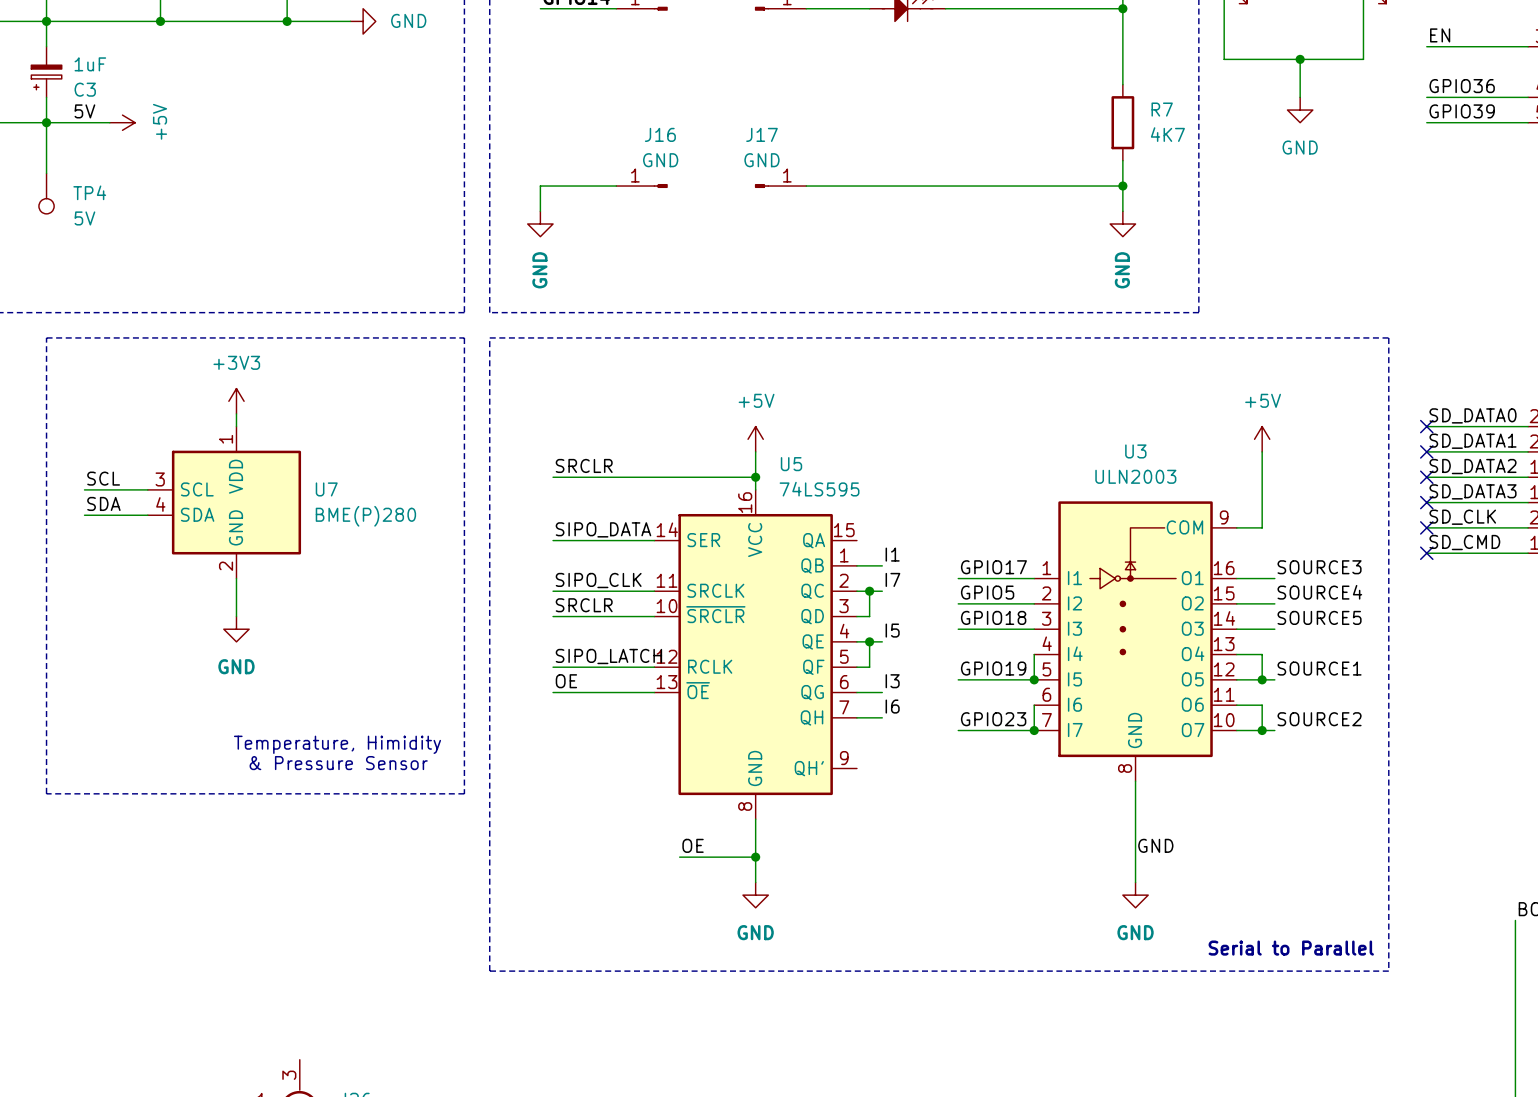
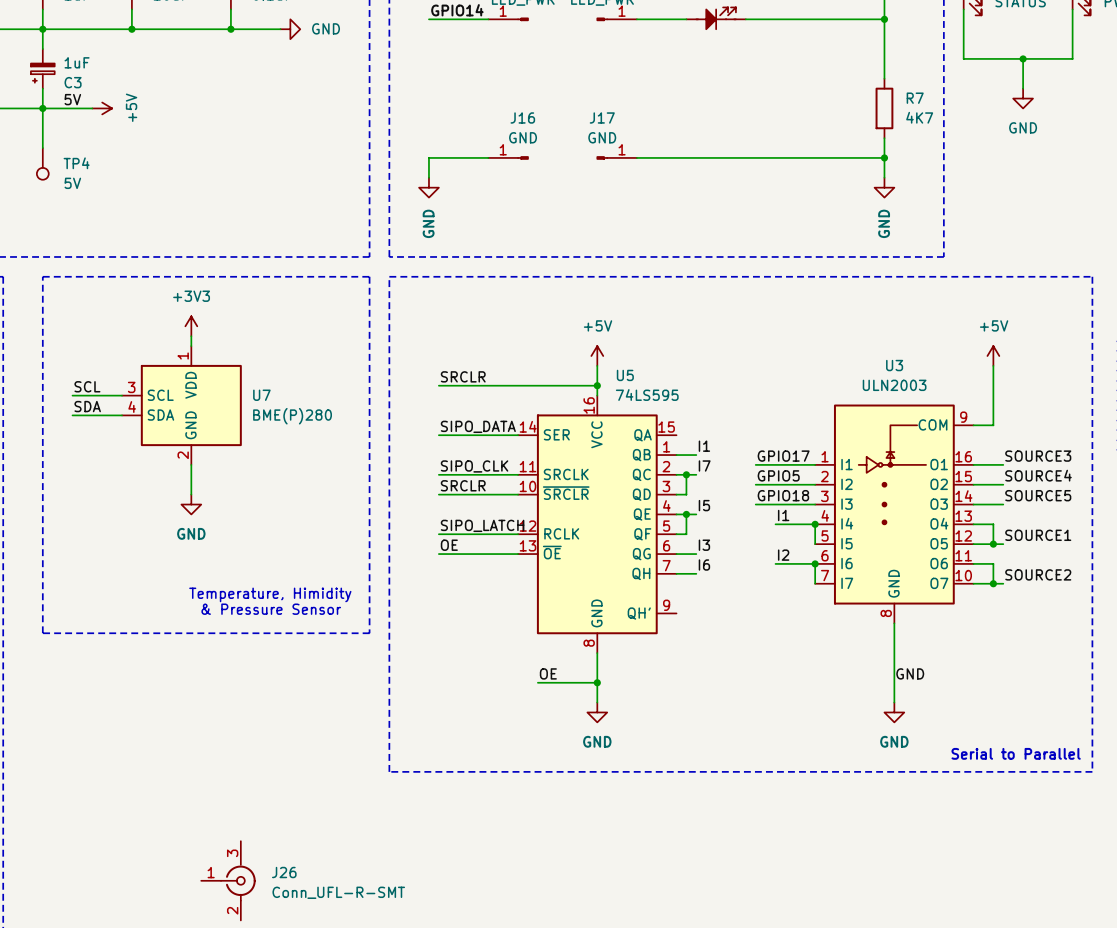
label: none -> I1 (783, 515)
wire: none -> (775, 524) (815, 524)
junction: none -> (815, 524)
label: GPIO19 (993, 668) -> none
wire: (958, 679) (1034, 679) -> none
junction: (1034, 679) -> none
label: none -> I2 (783, 555)
wire: none -> (775, 563) (815, 563)
junction: none -> (815, 563)
label: GPIO23 (993, 719) -> none
wire: (958, 730) (1034, 730) -> none
junction: (1034, 730) -> none

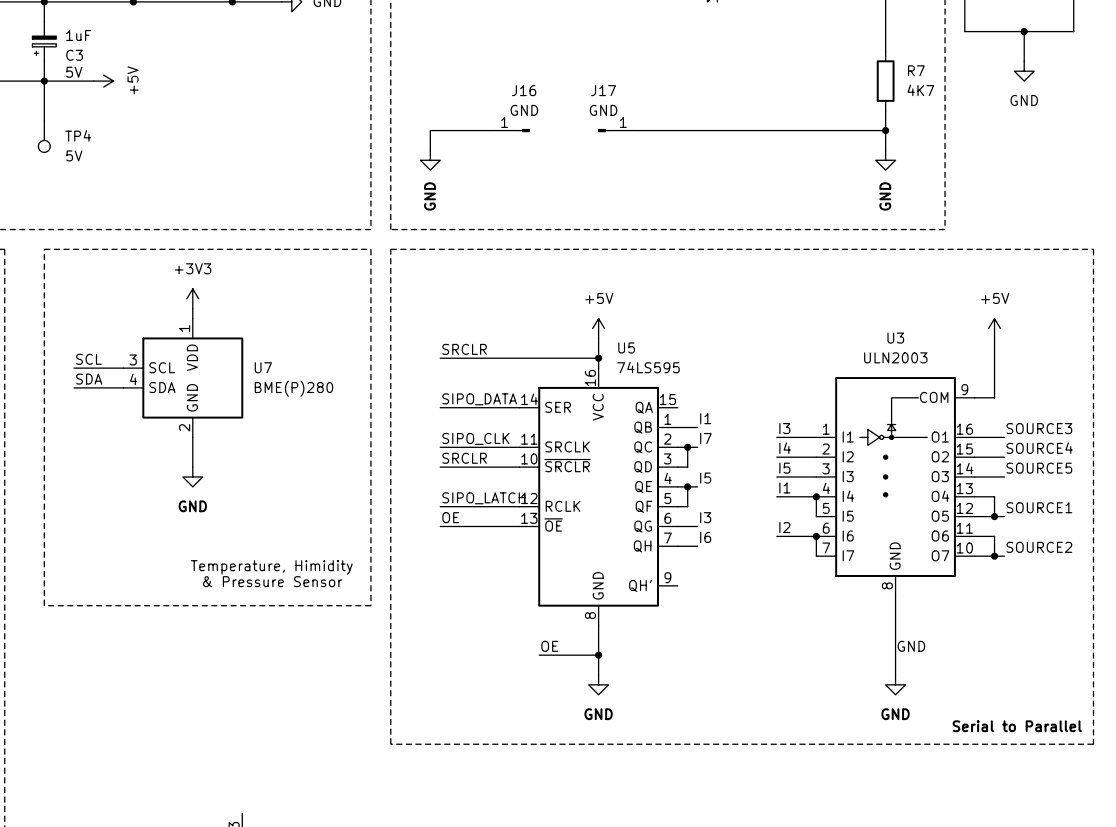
label: GPIO17 (783, 456) -> none
label: none -> I3 (784, 428)
wire: (755, 464) (775, 464) -> none
label: GPIO5 (778, 475) -> none
label: none -> I4 (785, 448)
wire: (755, 484) (775, 484) -> none
label: GPIO18 (783, 495) -> none
label: none -> I5 (784, 468)
wire: (755, 504) (775, 504) -> none

